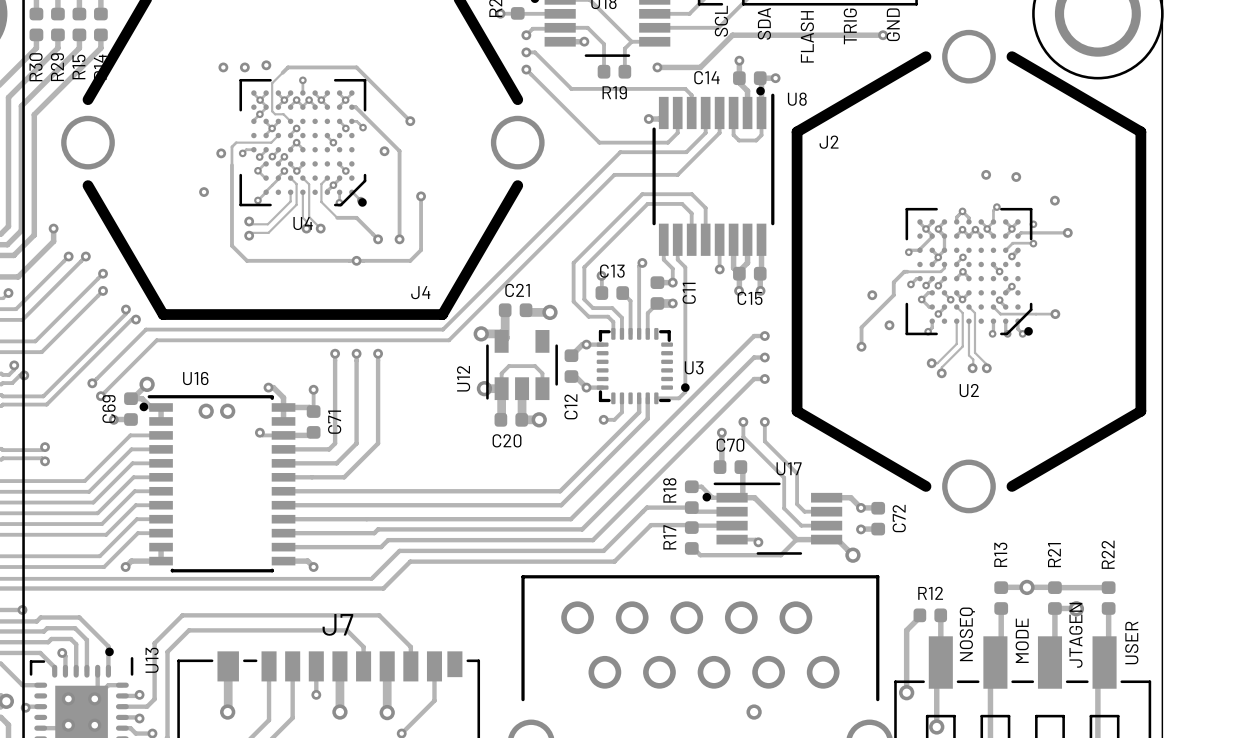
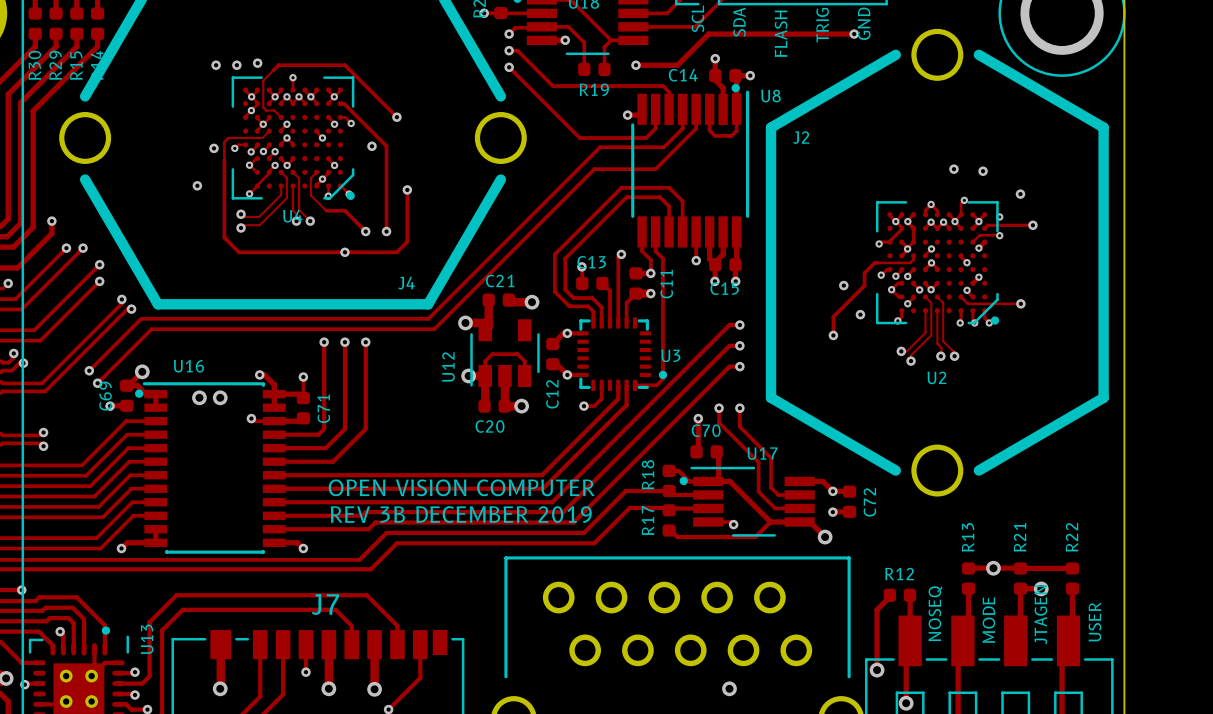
text: none -> OPEN VISION COMPUTER (461, 487)
text: none -> REV 3B DECEMBER 2019 (461, 514)

